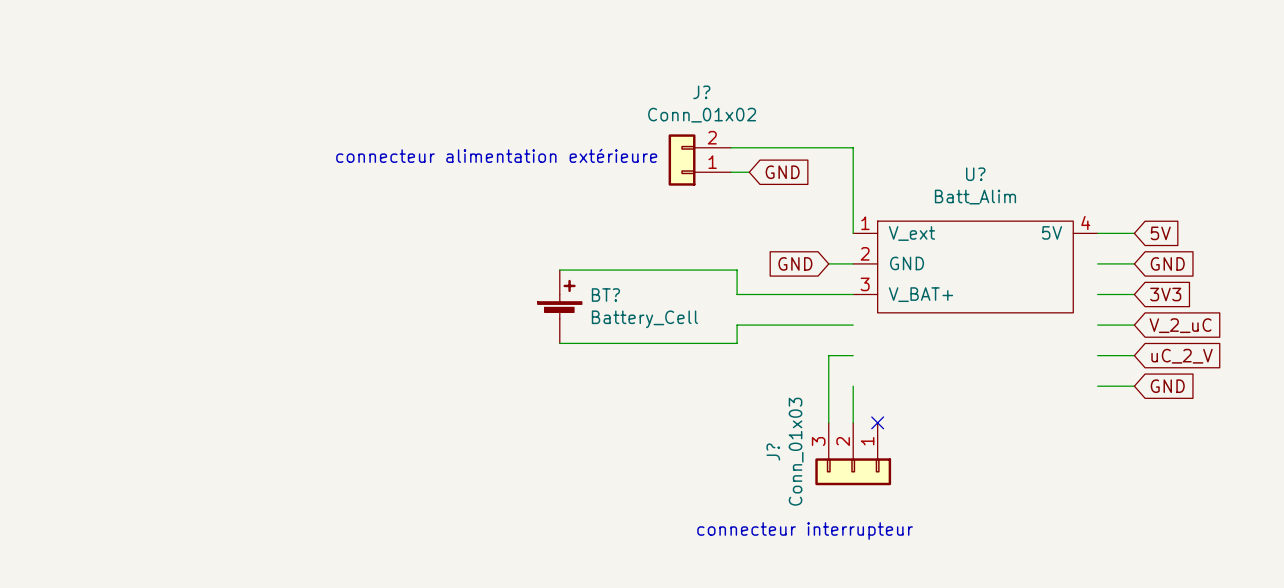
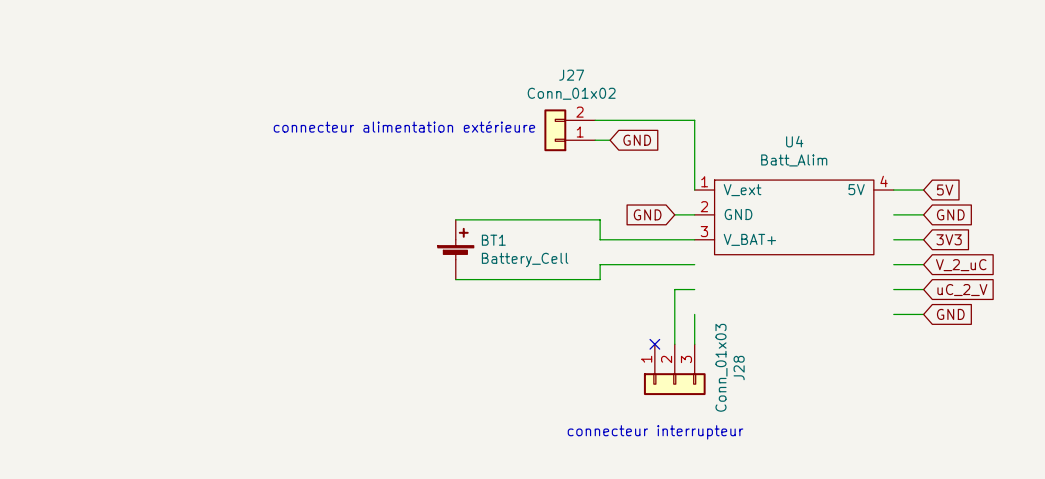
J? name: J? (701, 92) -> J27 (571, 75)
U? name: U? (975, 174) -> U4 (794, 141)
BT? name: BT? (605, 295) -> BT1 (493, 240)
no-connect mark: none -> (654, 344)
no-connect mark: (877, 422) -> none
J28: none -> Conn_01x03 (674, 369)
J?: Conn_01x03 (853, 454) -> none

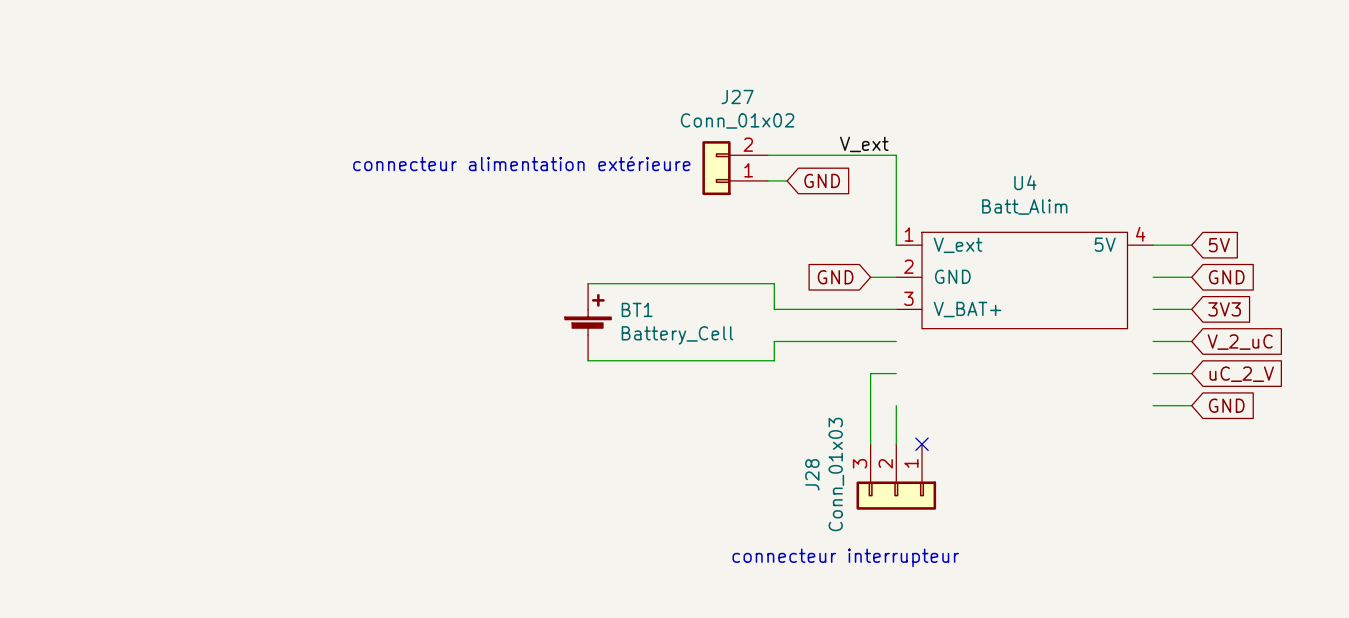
label: none -> V_ext (864, 144)
no-connect mark: (654, 344) -> none
no-connect mark: none -> (921, 444)
J28 flip: as is (674, 384) -> left-right (896, 495)

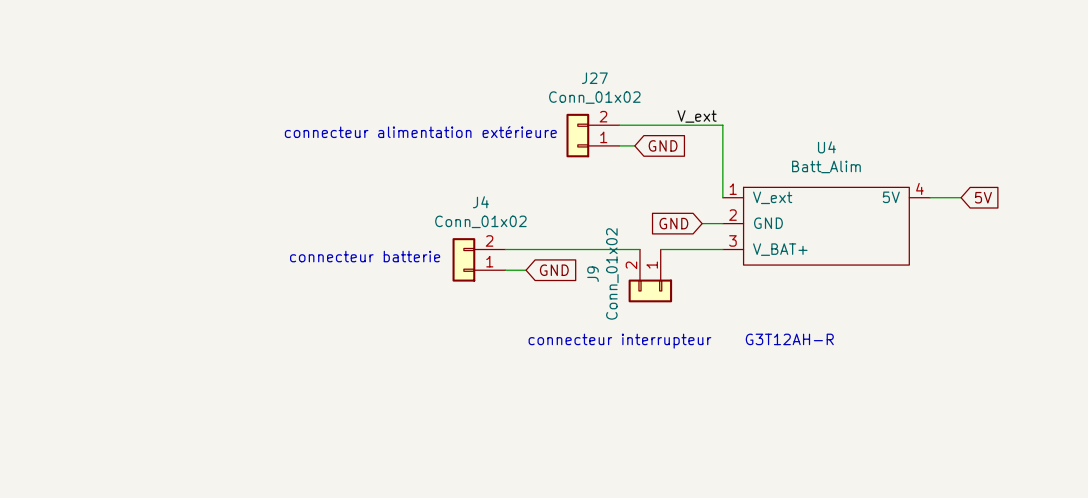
wire: (1153, 277) (1191, 277) -> none
global label: GND (1226, 277) -> none
wire: (588, 283) (774, 283) (774, 309) -> (505, 249) (624, 249)
wire: (793, 309) (819, 309) -> (505, 270) (526, 270)
wire: (1153, 309) (1191, 309) -> none
global label: 3V3 (1224, 309) -> none
text: none -> connecteur batterie (365, 256)
BT1: Battery_Cell (588, 322) -> none
J4: none -> Conn_01x02 (478, 259)
global label: none -> GND (554, 270)
wire: (896, 341) (774, 341) (774, 360) (588, 360) -> none
wire: (1153, 341) (1191, 341) -> none
J9: none -> Conn_01x02 (650, 275)
global label: V_2_uC (1240, 342) -> none
wire: (896, 373) (870, 373) (870, 444) -> none
wire: (1153, 373) (1191, 373) -> none
global label: uC_2_V (1241, 374) -> none
wire: (896, 405) (896, 444) -> none
wire: (1153, 405) (1191, 405) -> none
global label: GND (1226, 405) -> none
text: none -> G3T12AH-R (789, 339)
no-connect mark: (921, 444) -> none
J28: Conn_01x03 (896, 476) -> none
text position: connecteur interrupteur (845, 557) -> connecteur interrupteur (619, 341)

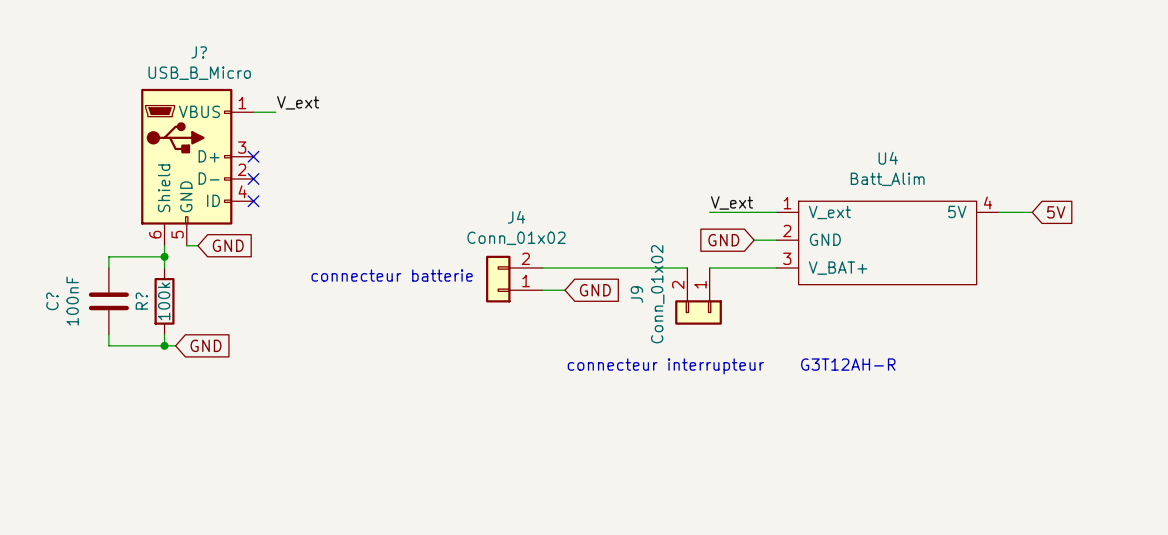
label: none -> V_ext (298, 102)
wire: none -> (253, 112) (275, 112)
label position: V_ext (697, 116) -> V_ext (731, 202)
wire: (619, 125) (722, 125) (722, 197) -> (709, 212) (776, 212)
text: connecteur alimentation extérieure (420, 132) -> none
J27: Conn_01x02 (592, 135) -> none
no-connect mark: none -> (253, 156)
wire: (619, 145) (634, 145) -> none
global label: GND (663, 145) -> none
J?: none -> USB_B_Micro (197, 167)
no-connect mark: none -> (253, 178)
no-connect mark: none -> (253, 201)
wire: none -> (164, 245) (164, 267)
wire: none -> (186, 245) (197, 245)
global label: none -> GND (228, 245)
wire: none -> (164, 256) (108, 256) (108, 267)
junction: none -> (164, 256)
C?: none -> 100nF (108, 301)
R?: none -> 100k (164, 301)
wire: none -> (108, 334) (108, 345) (175, 345)
wire: none -> (164, 334) (164, 345)
junction: none -> (164, 345)
global label: none -> GND (205, 345)

